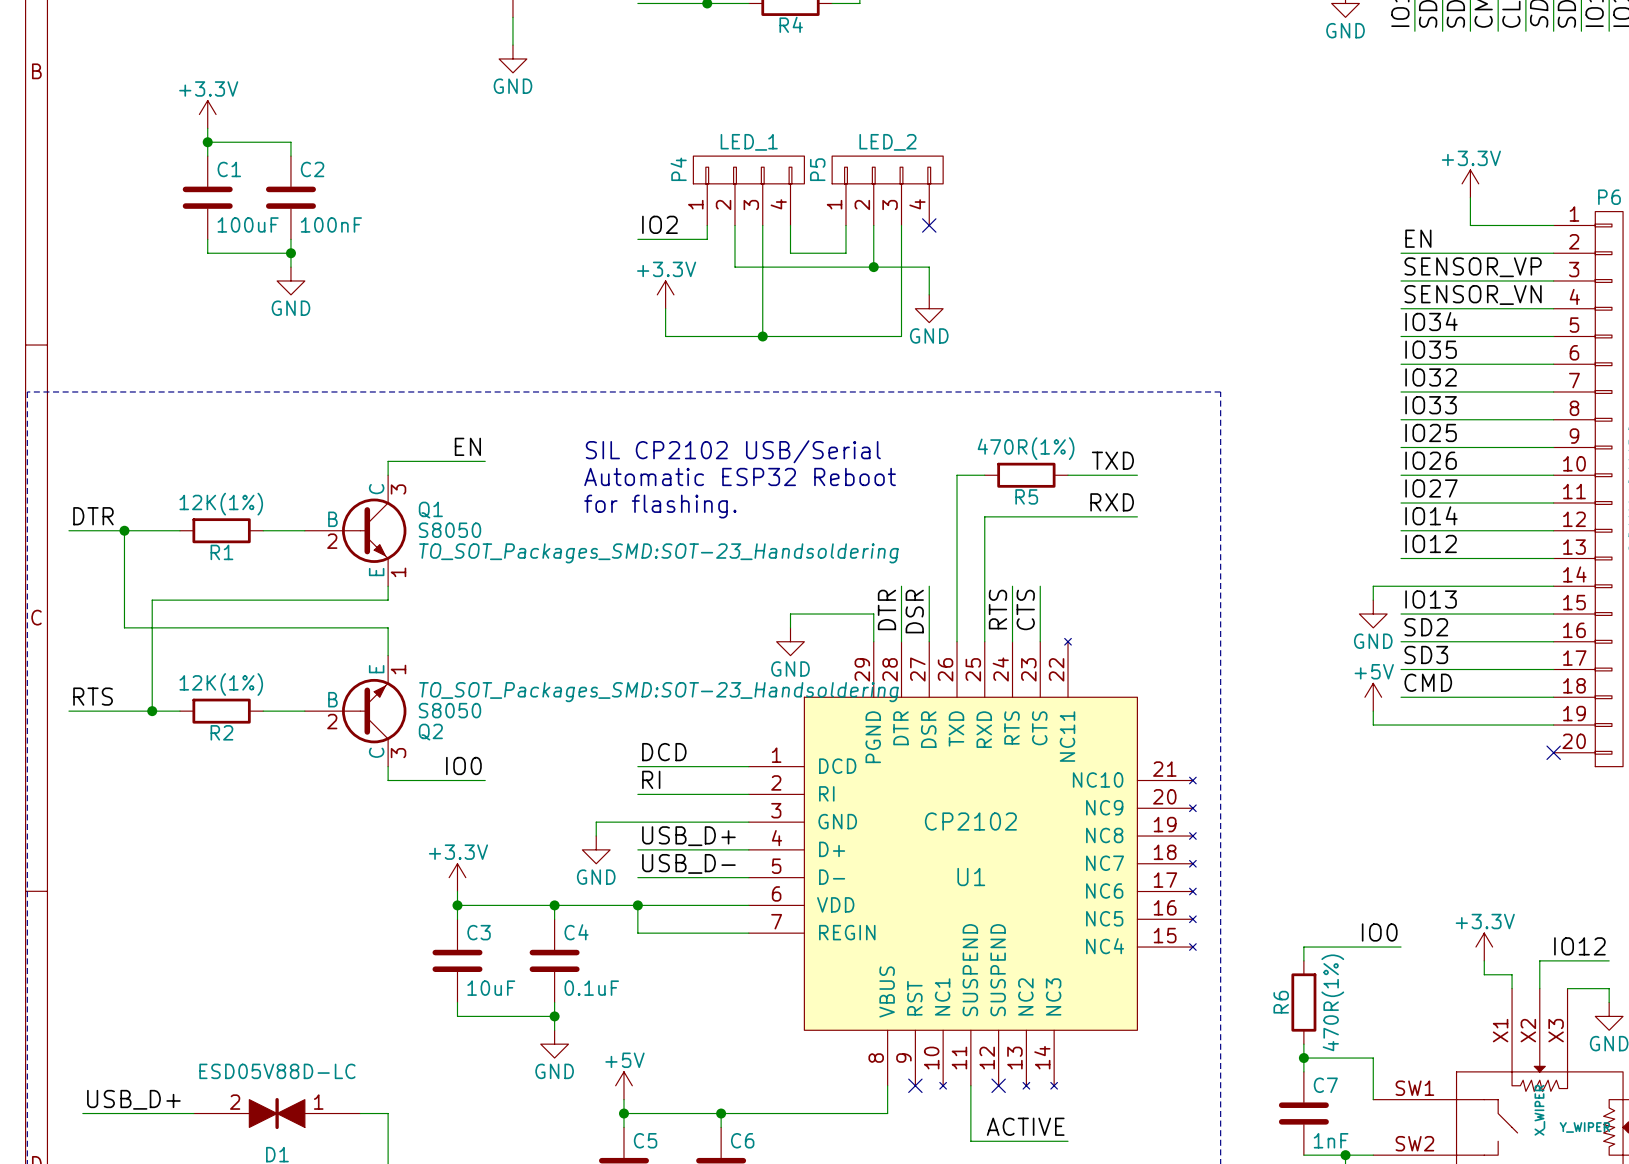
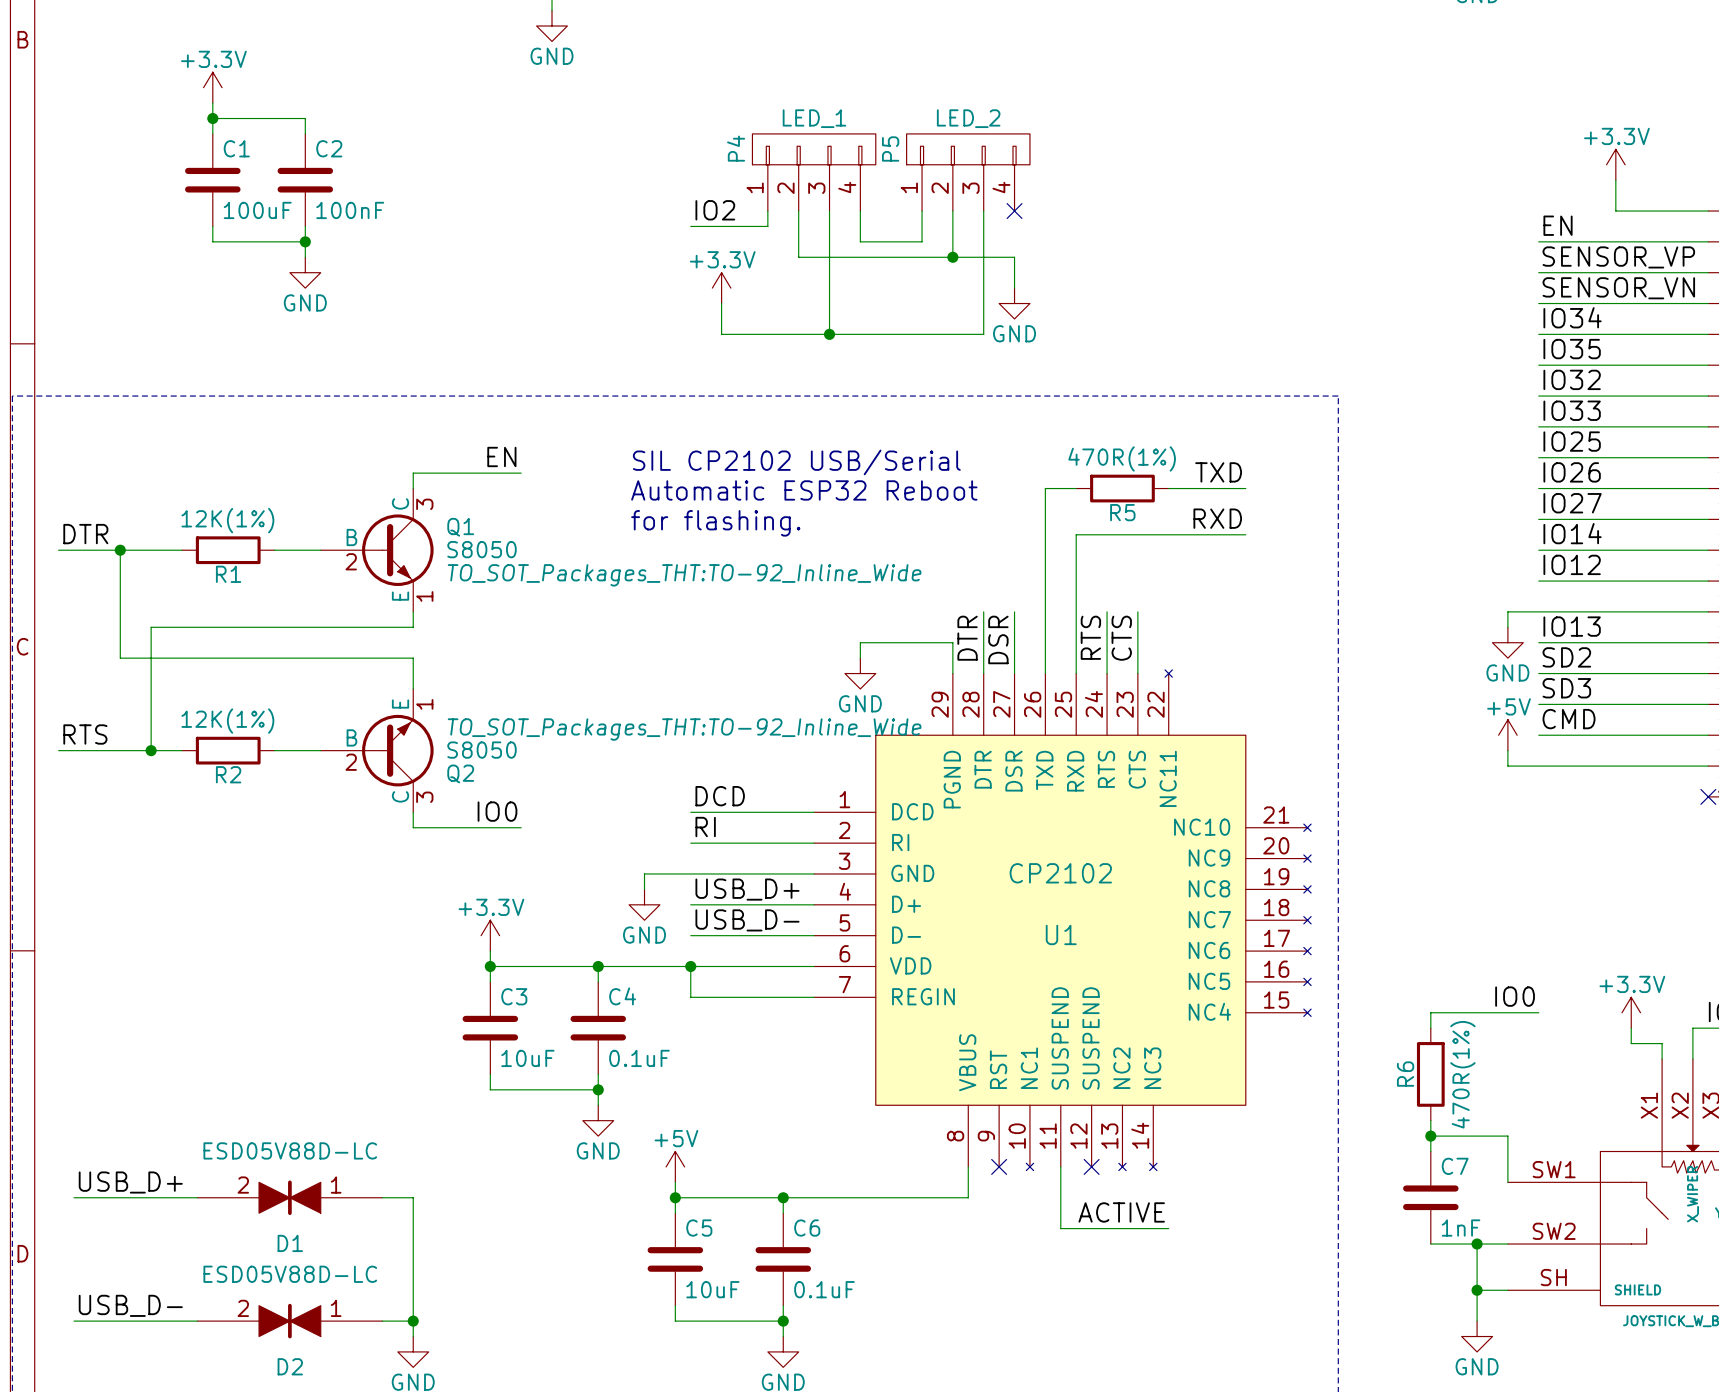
Q1 text: TO_SOT_Packages_SMD:SOT-23_Handsoldering (658, 553) -> TO_SOT_Packages_THT:TO-92_Inline_Wide (684, 575)
Q2 text: TO_SOT_Packages_SMD:SOT-23_Handsoldering (658, 692) -> TO_SOT_Packages_THT:TO-92_Inline_Wide (684, 729)

